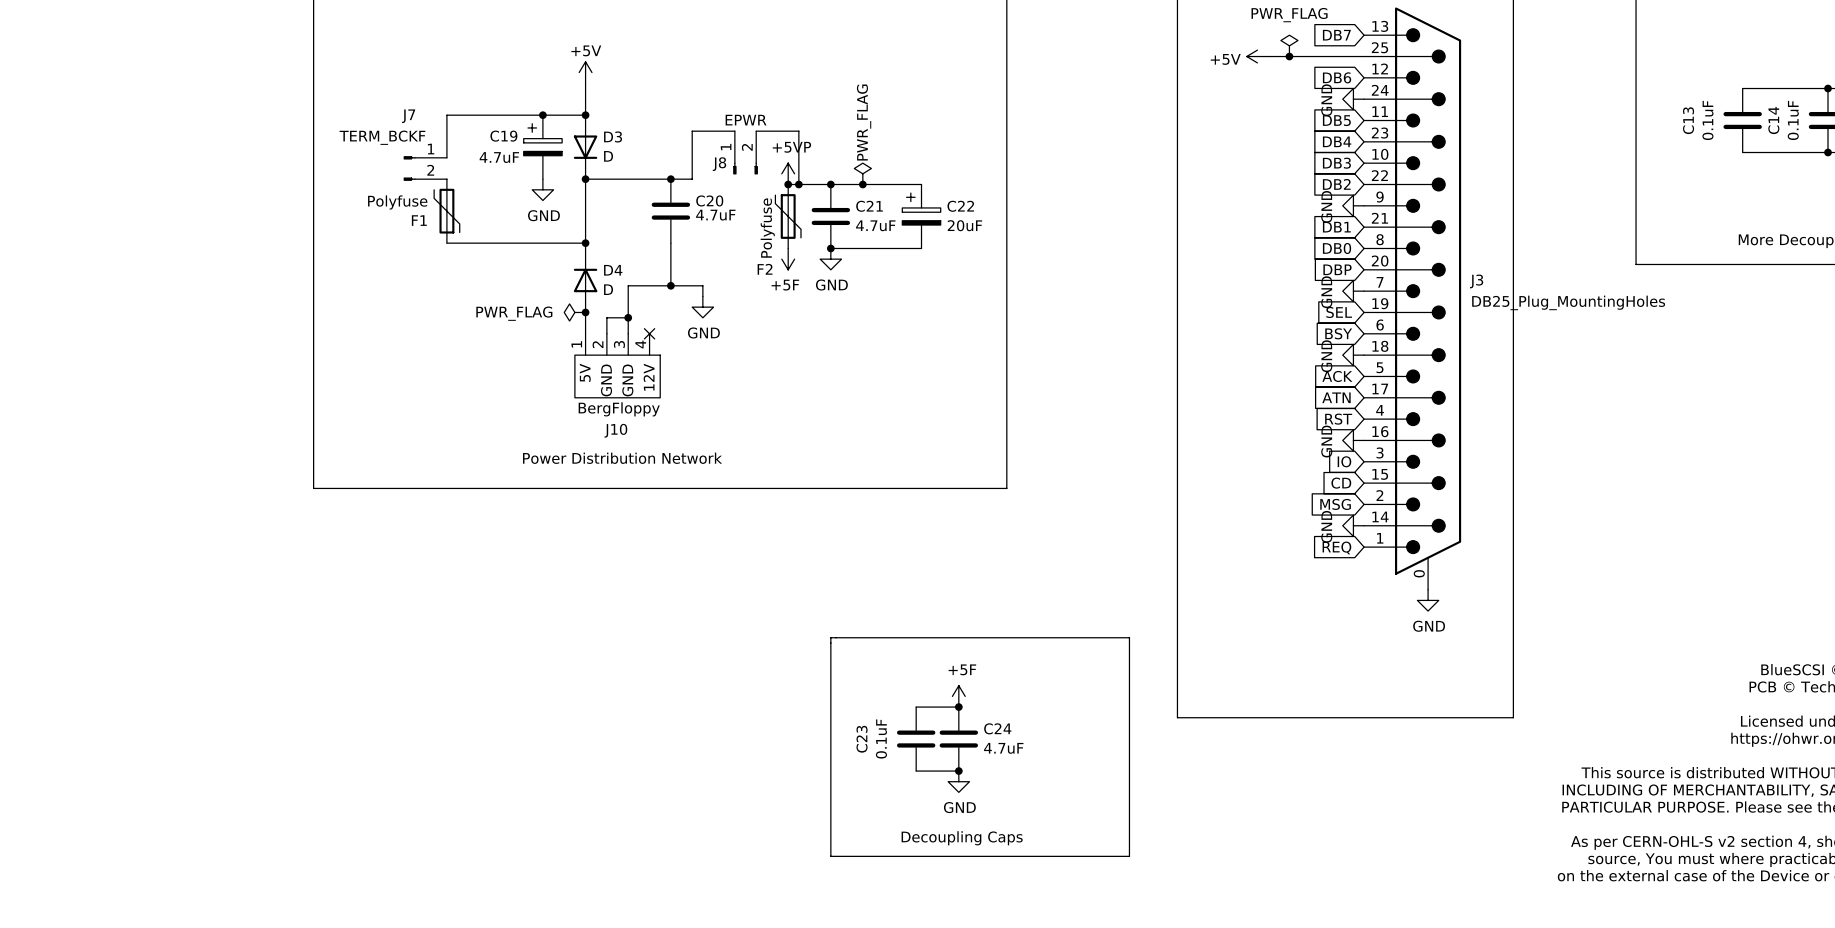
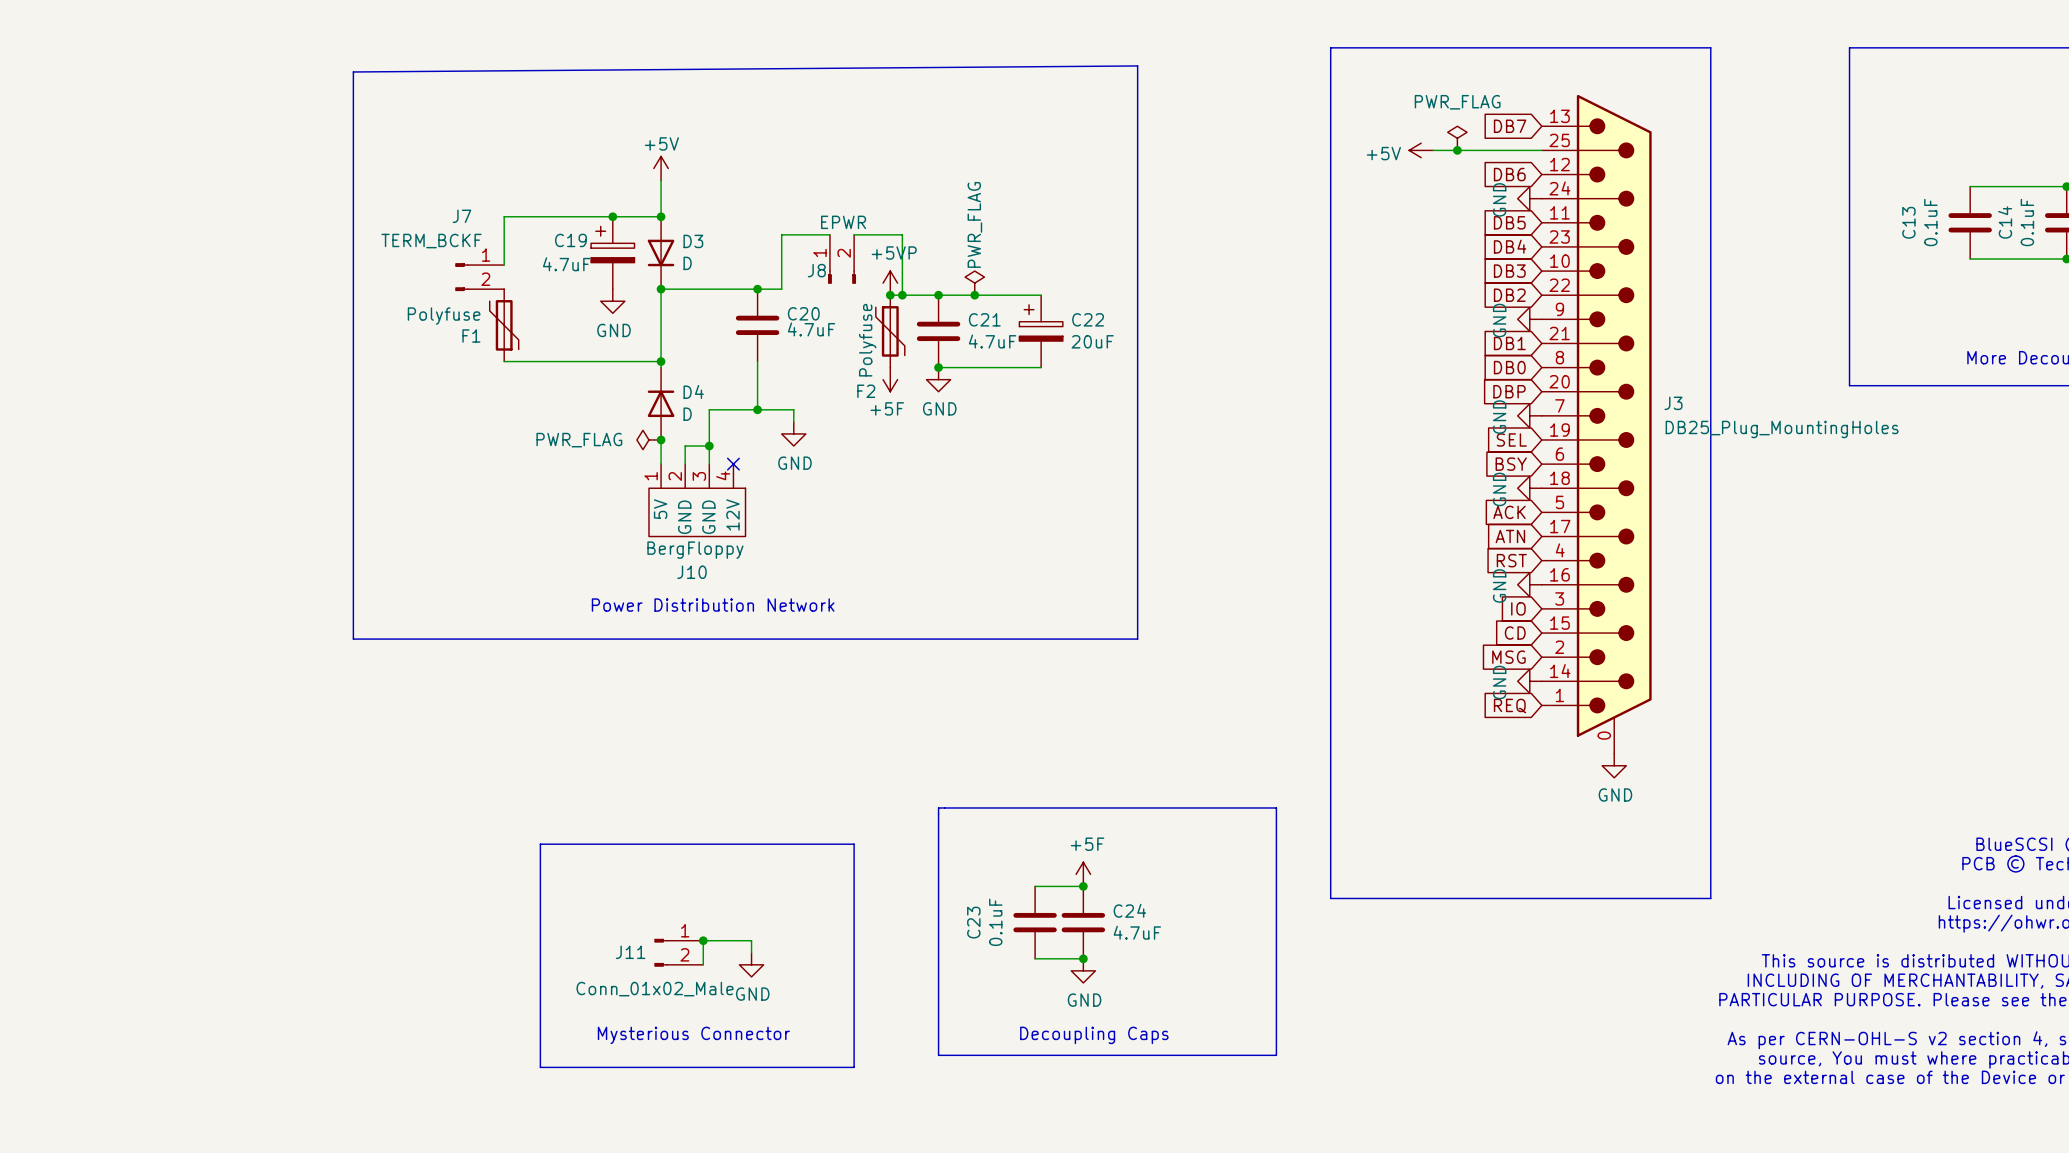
line: none -> (540, 844) (540, 1067) (854, 1067) (854, 844) (540, 844)
junction: none -> (703, 940)
J11: none -> Conn_01x02_Male (678, 952)
wire: none -> (751, 952) (751, 940) (703, 940) (703, 964)
power symbol: none -> GND (751, 964)
text: none -> Mysterious Connector (693, 1035)

